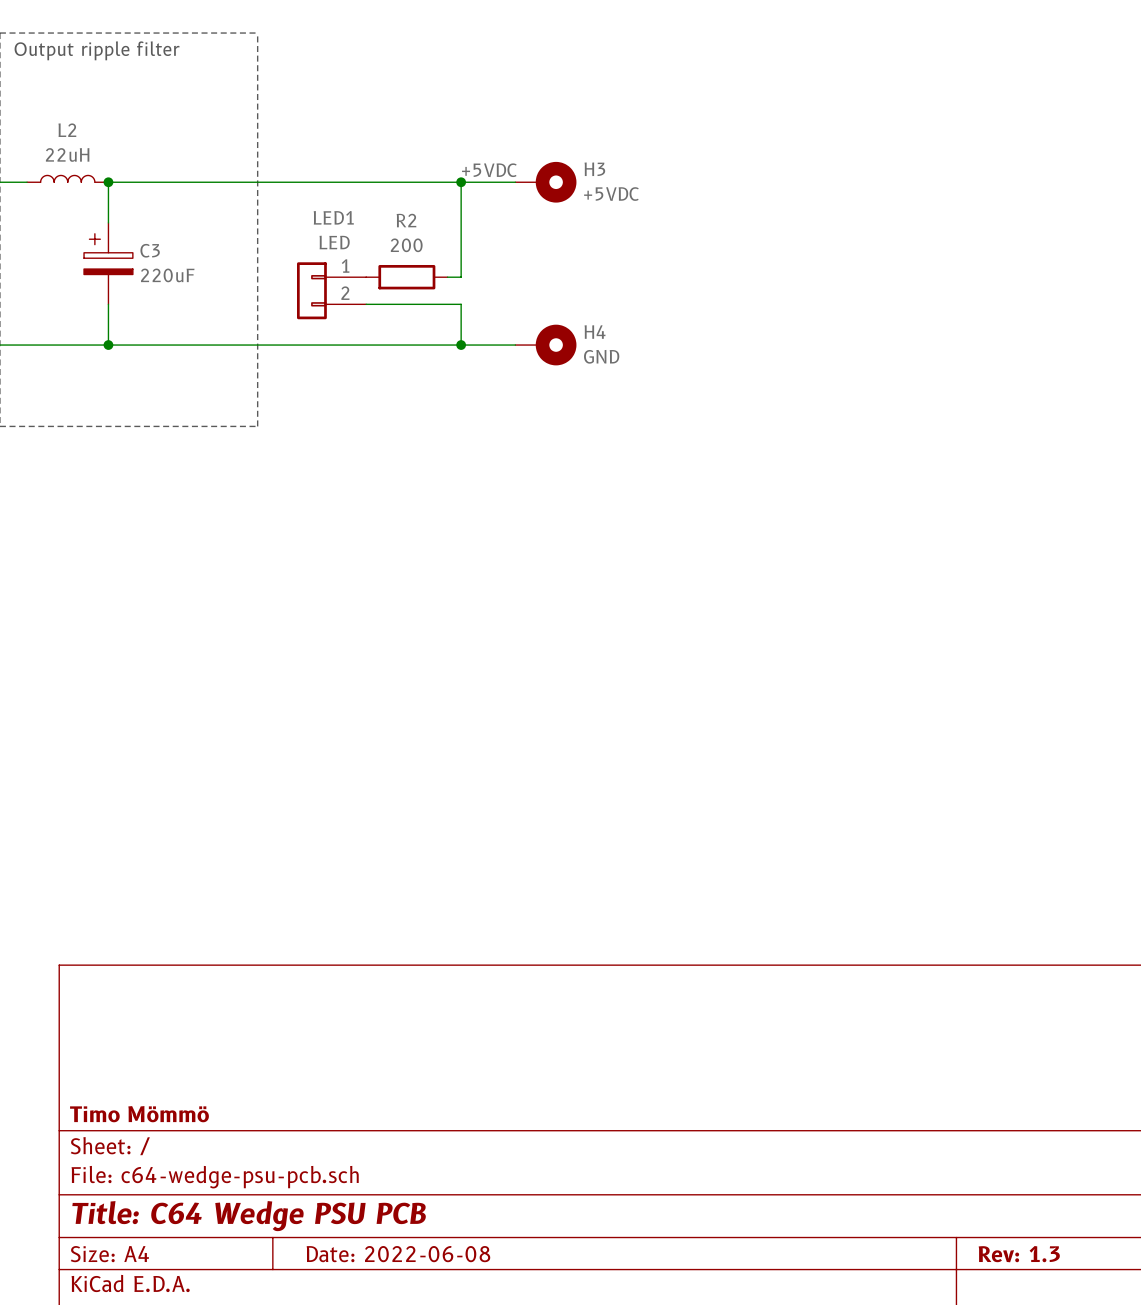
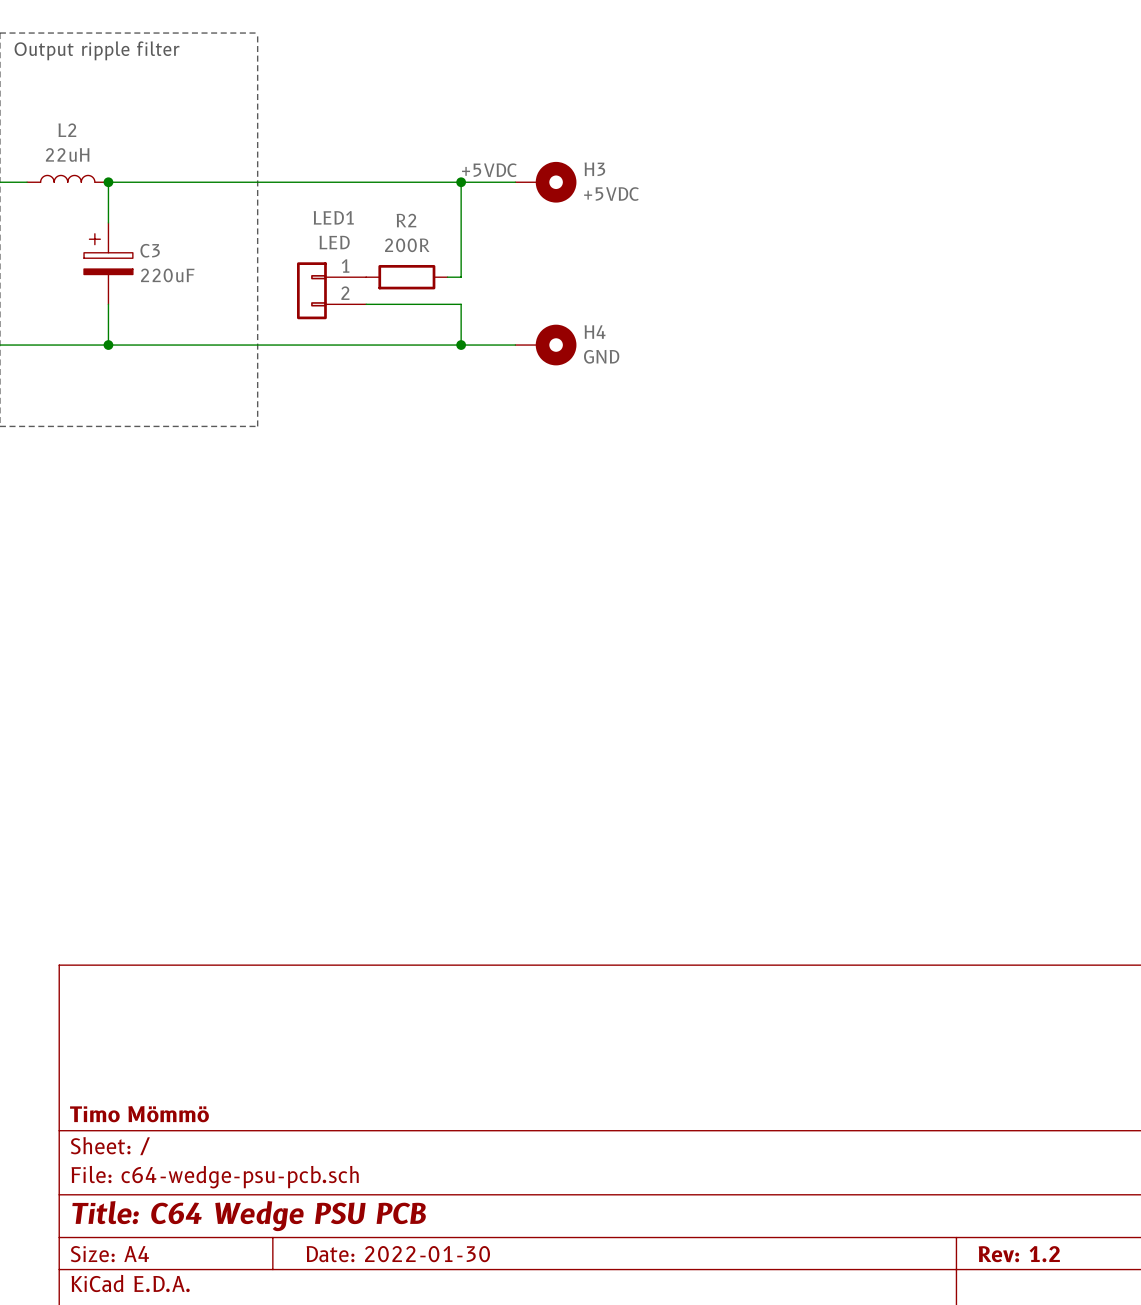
R2 value: 200 (406, 245) -> 200R (407, 245)
title block: Date: 2022-06-08 (398, 1254) -> Date: 2022-01-30 (398, 1254)
title block: Rev: 1.3 (1019, 1254) -> Rev: 1.2 (1019, 1254)

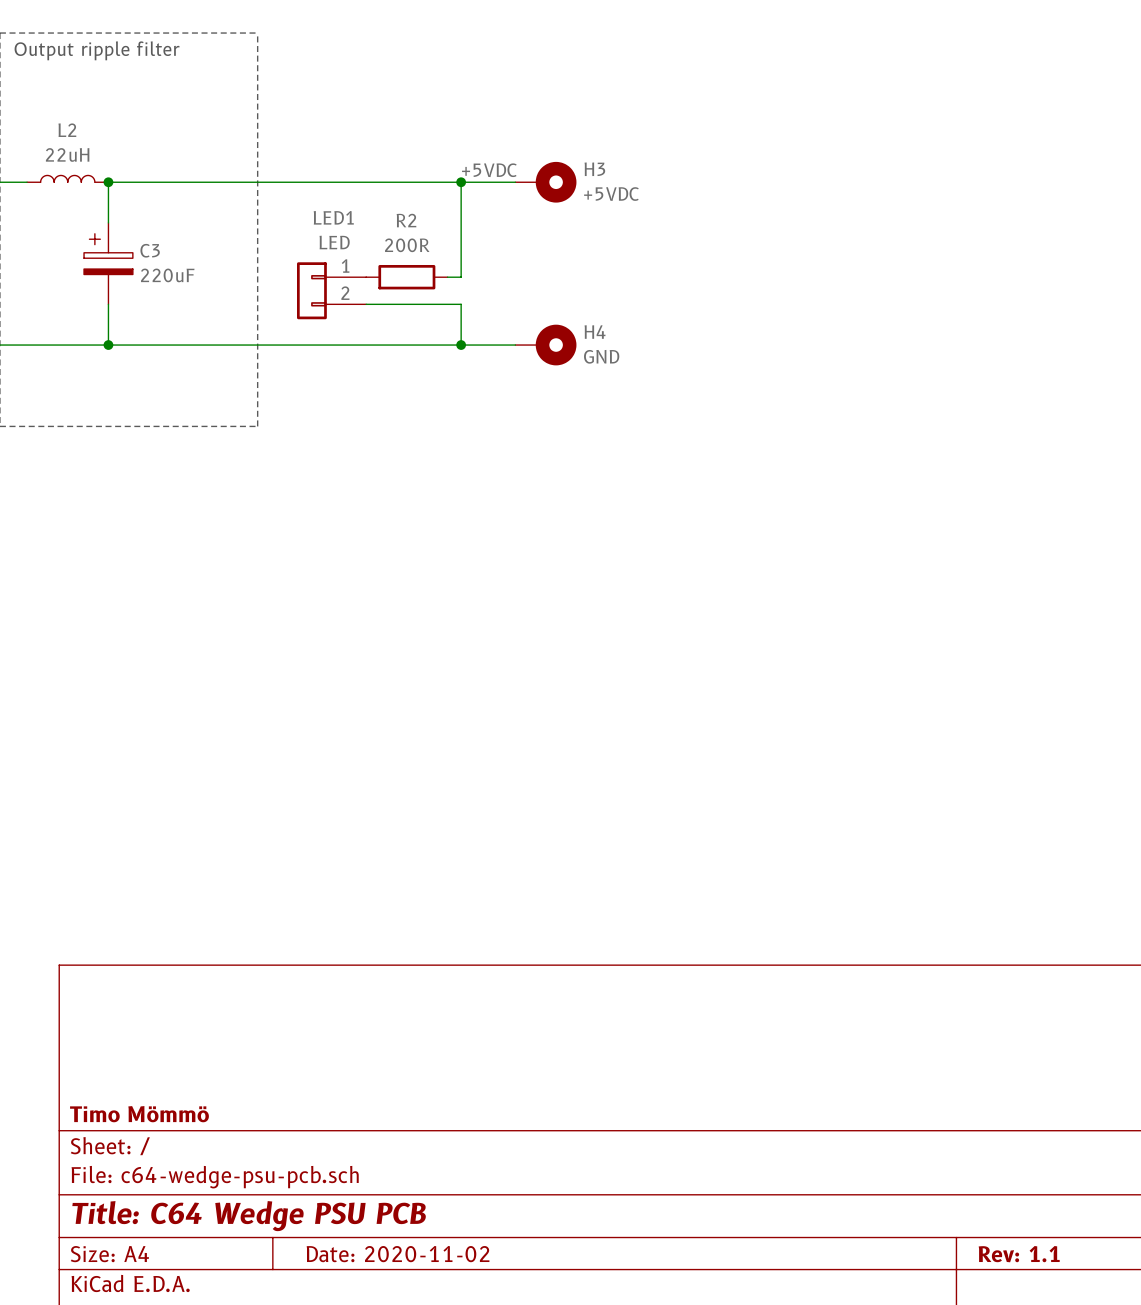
title block: Date: 2022-01-30 (398, 1254) -> Date: 2020-11-02 (398, 1254)
title block: Rev: 1.2 (1019, 1254) -> Rev: 1.1 (1019, 1254)

